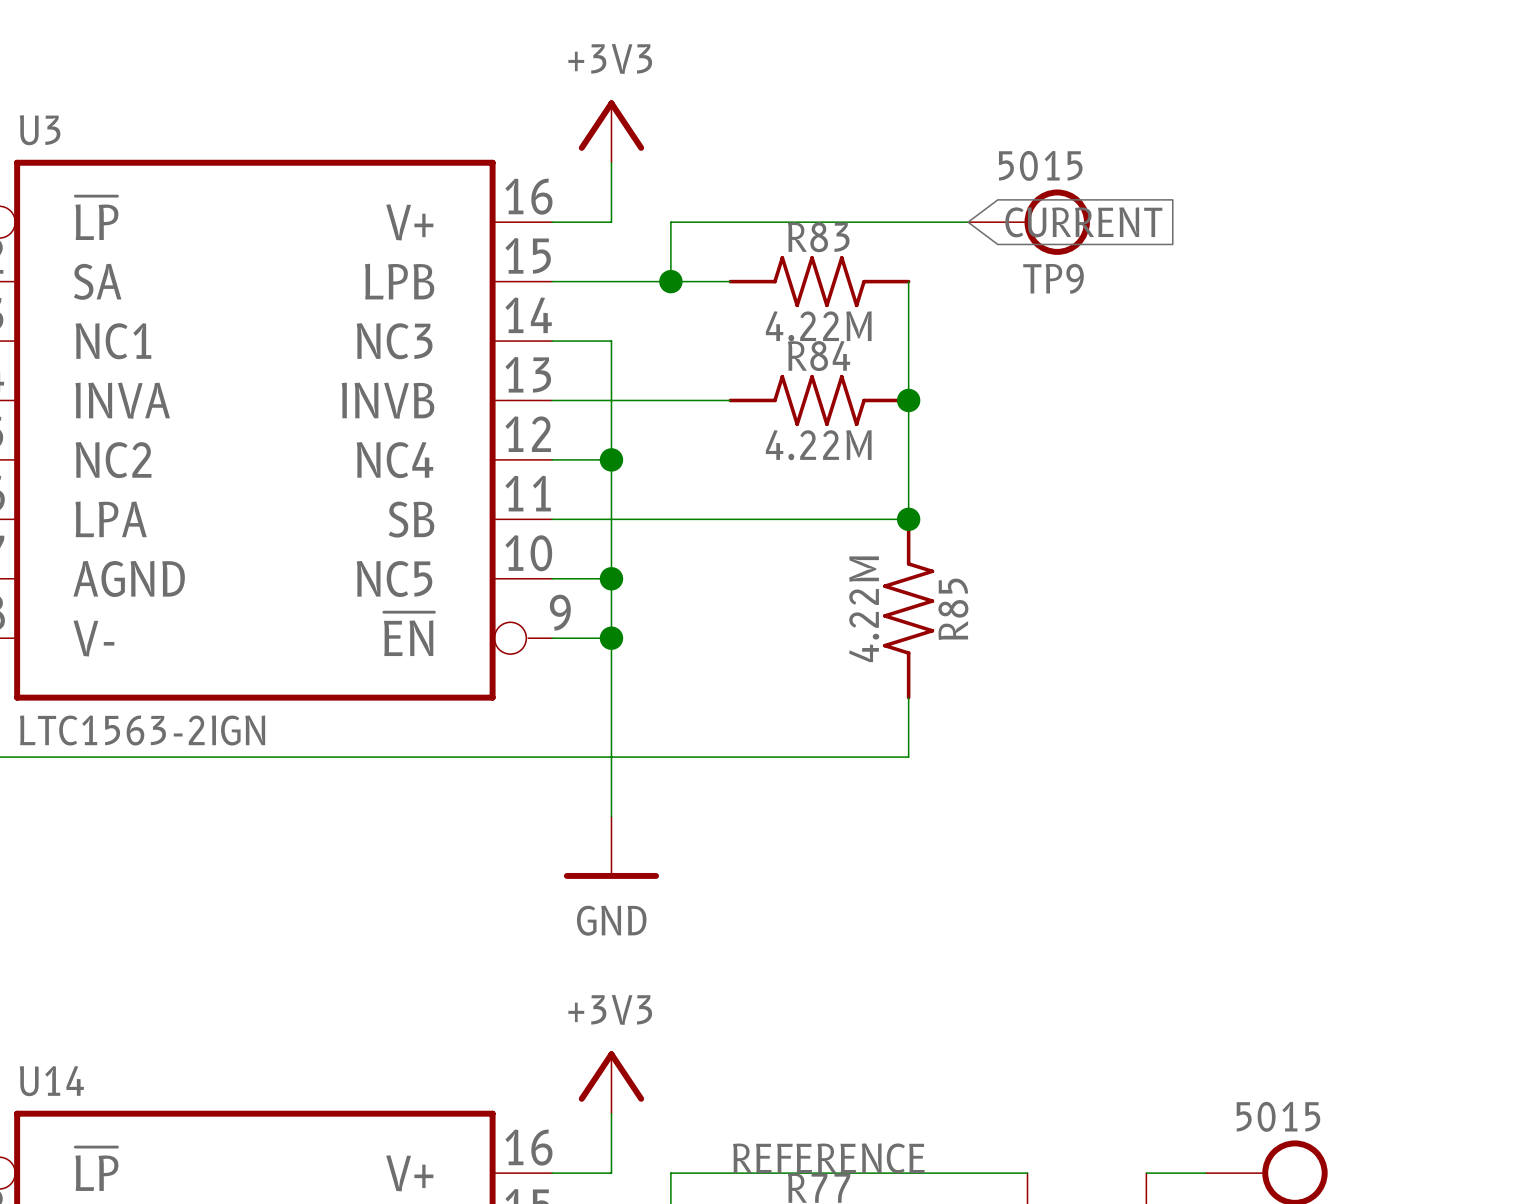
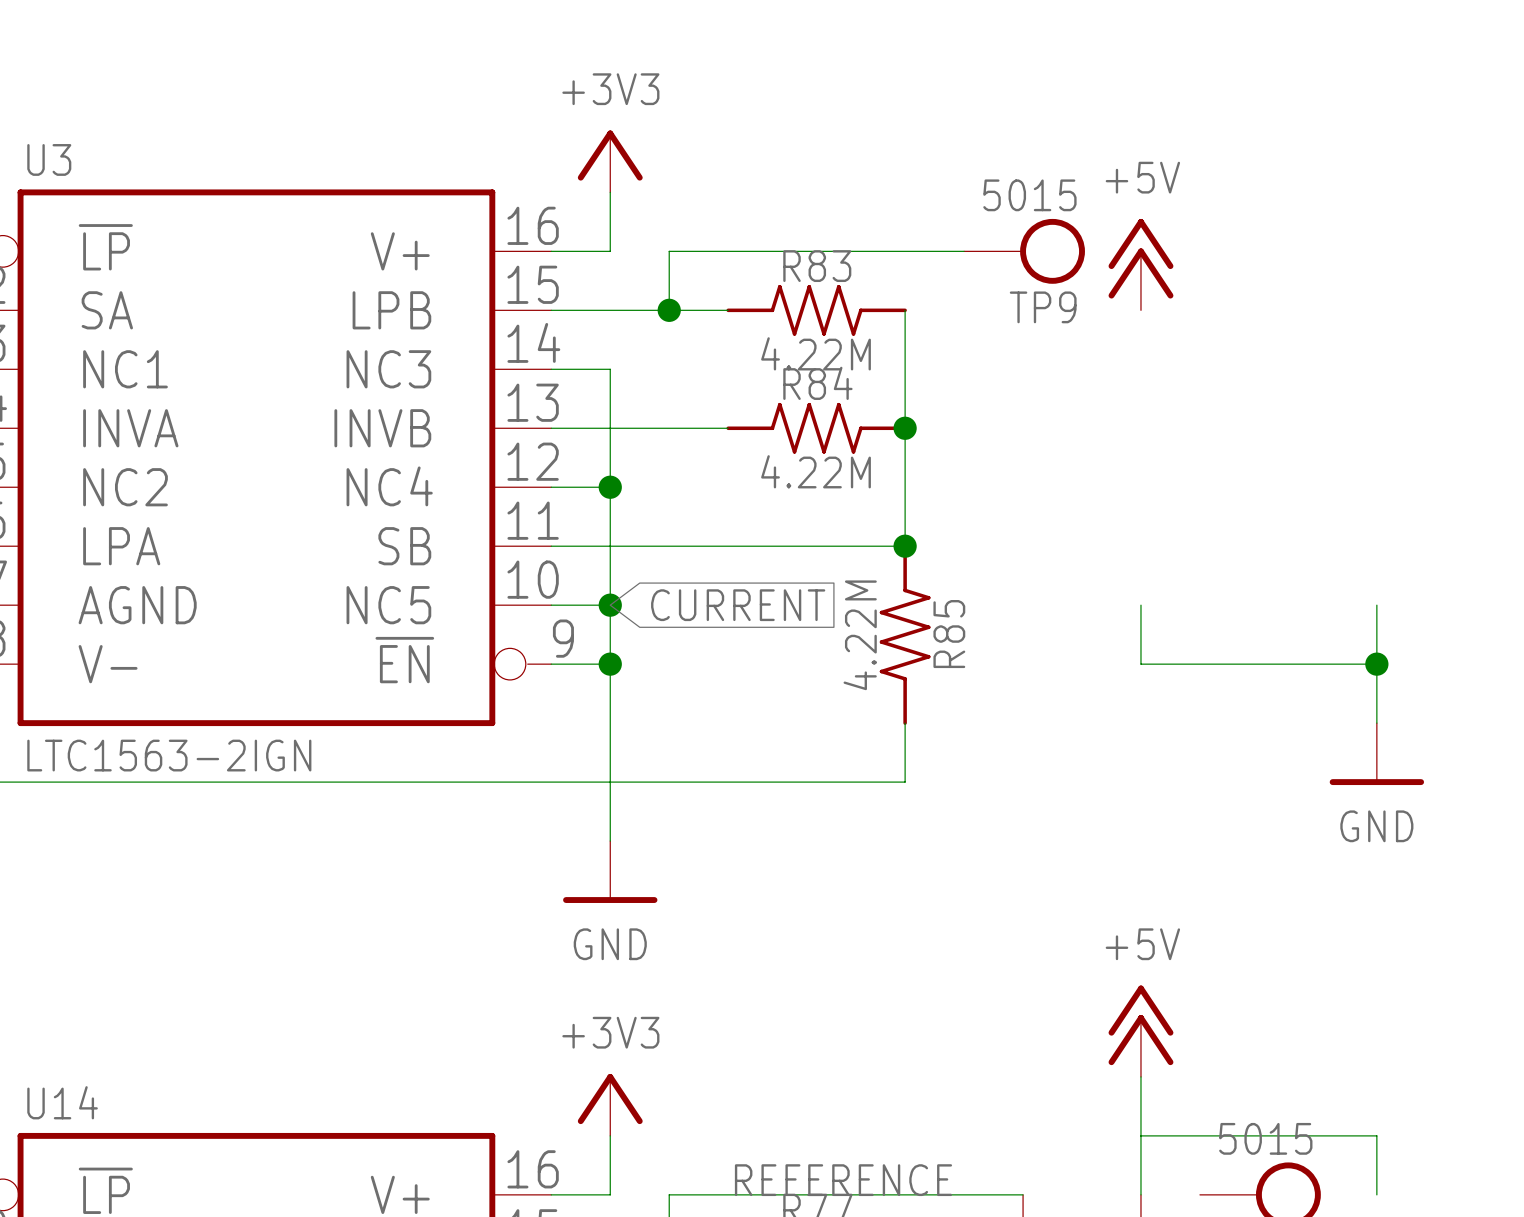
global label position: CURRENT (1083, 222) -> CURRENT (738, 605)
power symbol: none -> +5V (1140, 264)
wire: none -> (1140, 605) (1140, 664) (1376, 664)
wire: none -> (1376, 605) (1376, 723)
junction: none -> (1376, 664)
power symbol: none -> GND (1376, 754)
power symbol: none -> +5V (1140, 1031)
wire: none -> (1140, 1135) (1376, 1135) (1376, 1194)
wire: (1146, 1173) (1205, 1173) -> (1140, 1194) (1140, 1076)

